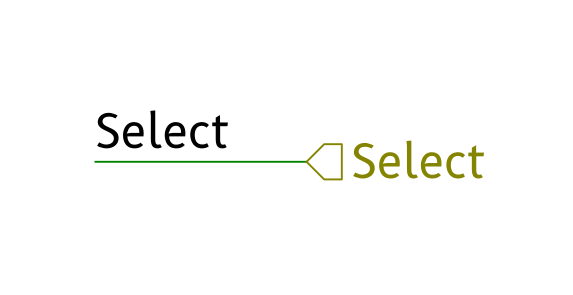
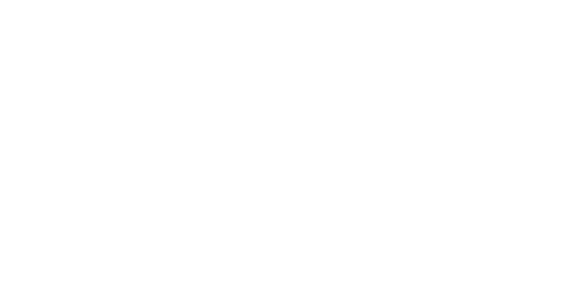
label: Select (162, 129) -> none
hierarchical label: Select (418, 159) -> none
wire: (95, 161) (306, 161) -> none

